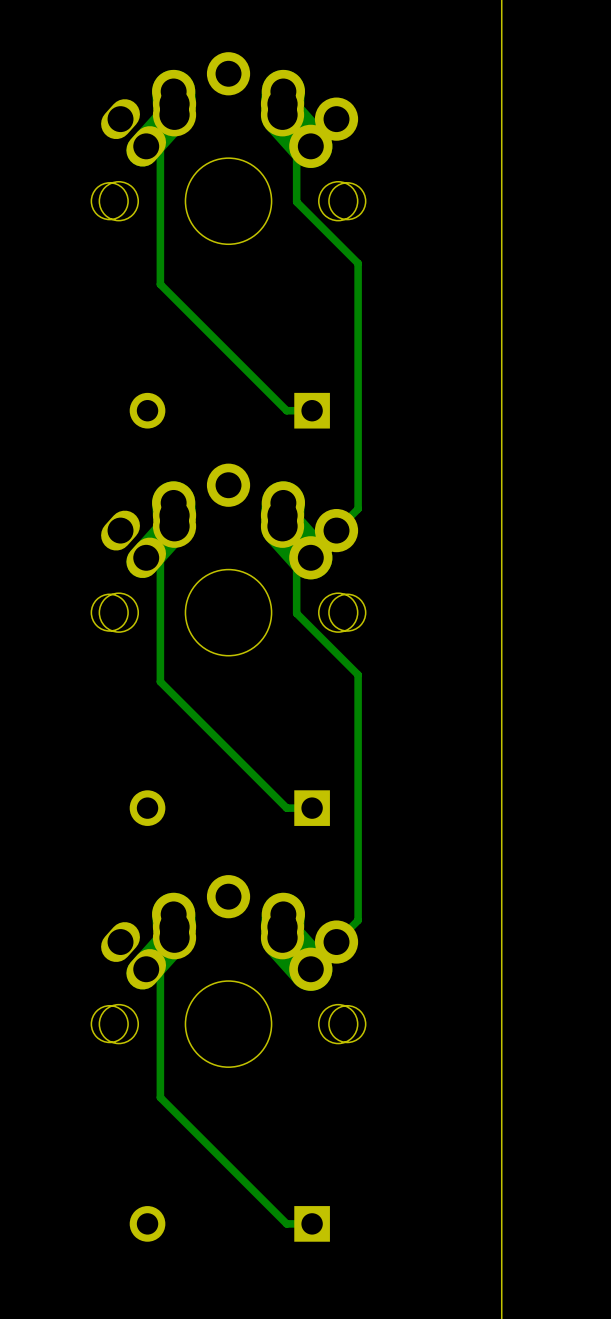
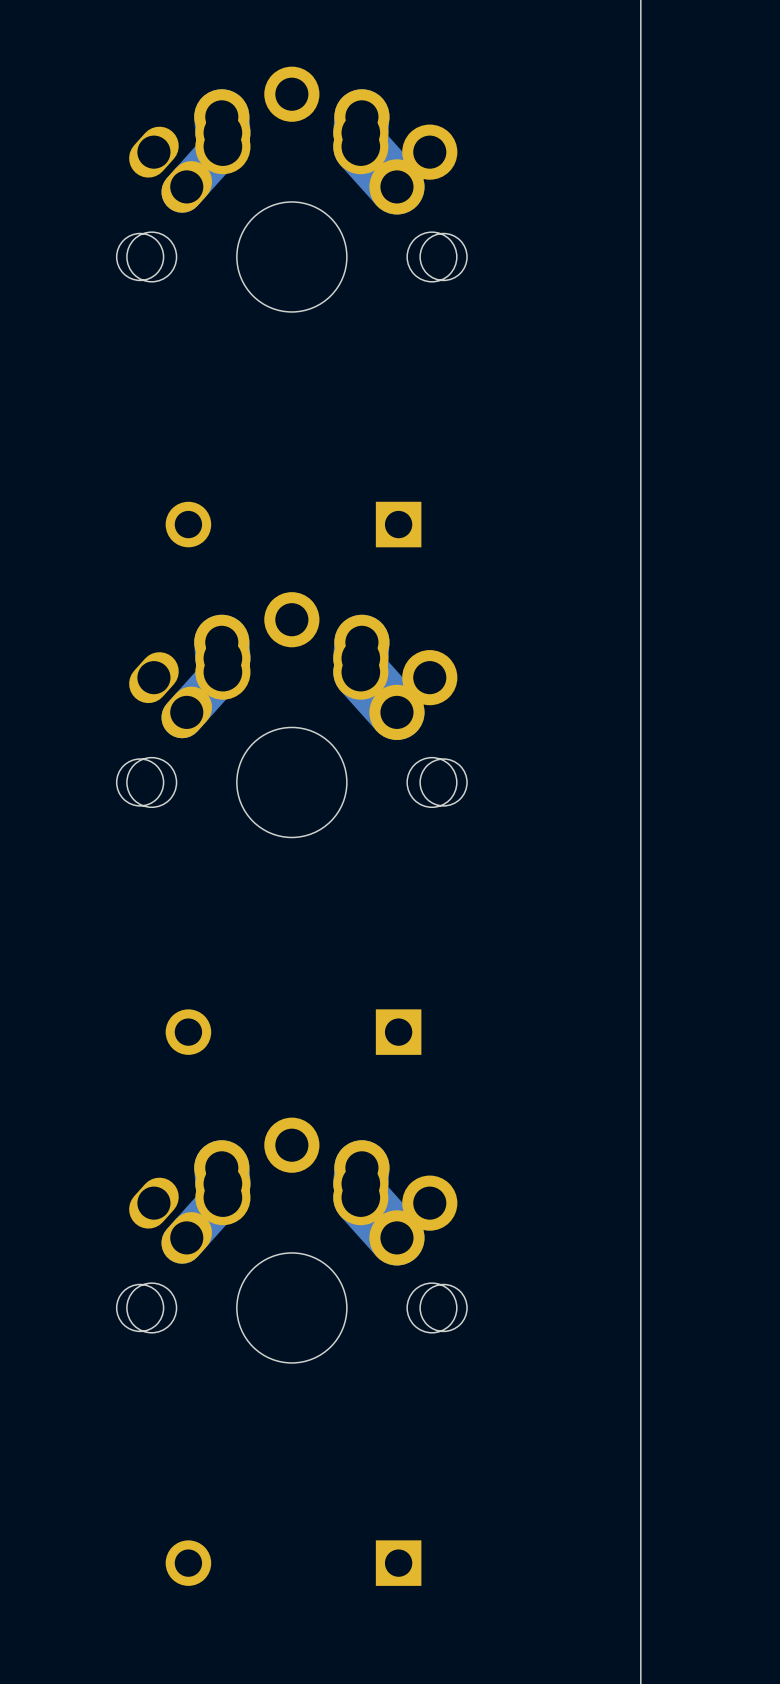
track: (160, 130) (160, 284) (286, 410) (312, 410) -> none
track: (296, 130) (296, 201) (358, 263) (358, 508) (336, 530) -> none
track: (160, 542) (160, 681) (286, 808) (312, 808) -> none
track: (296, 542) (296, 613) (358, 674) (358, 920) (336, 942) -> none
track: (160, 953) (160, 1097) (286, 1223) (312, 1223) -> none

